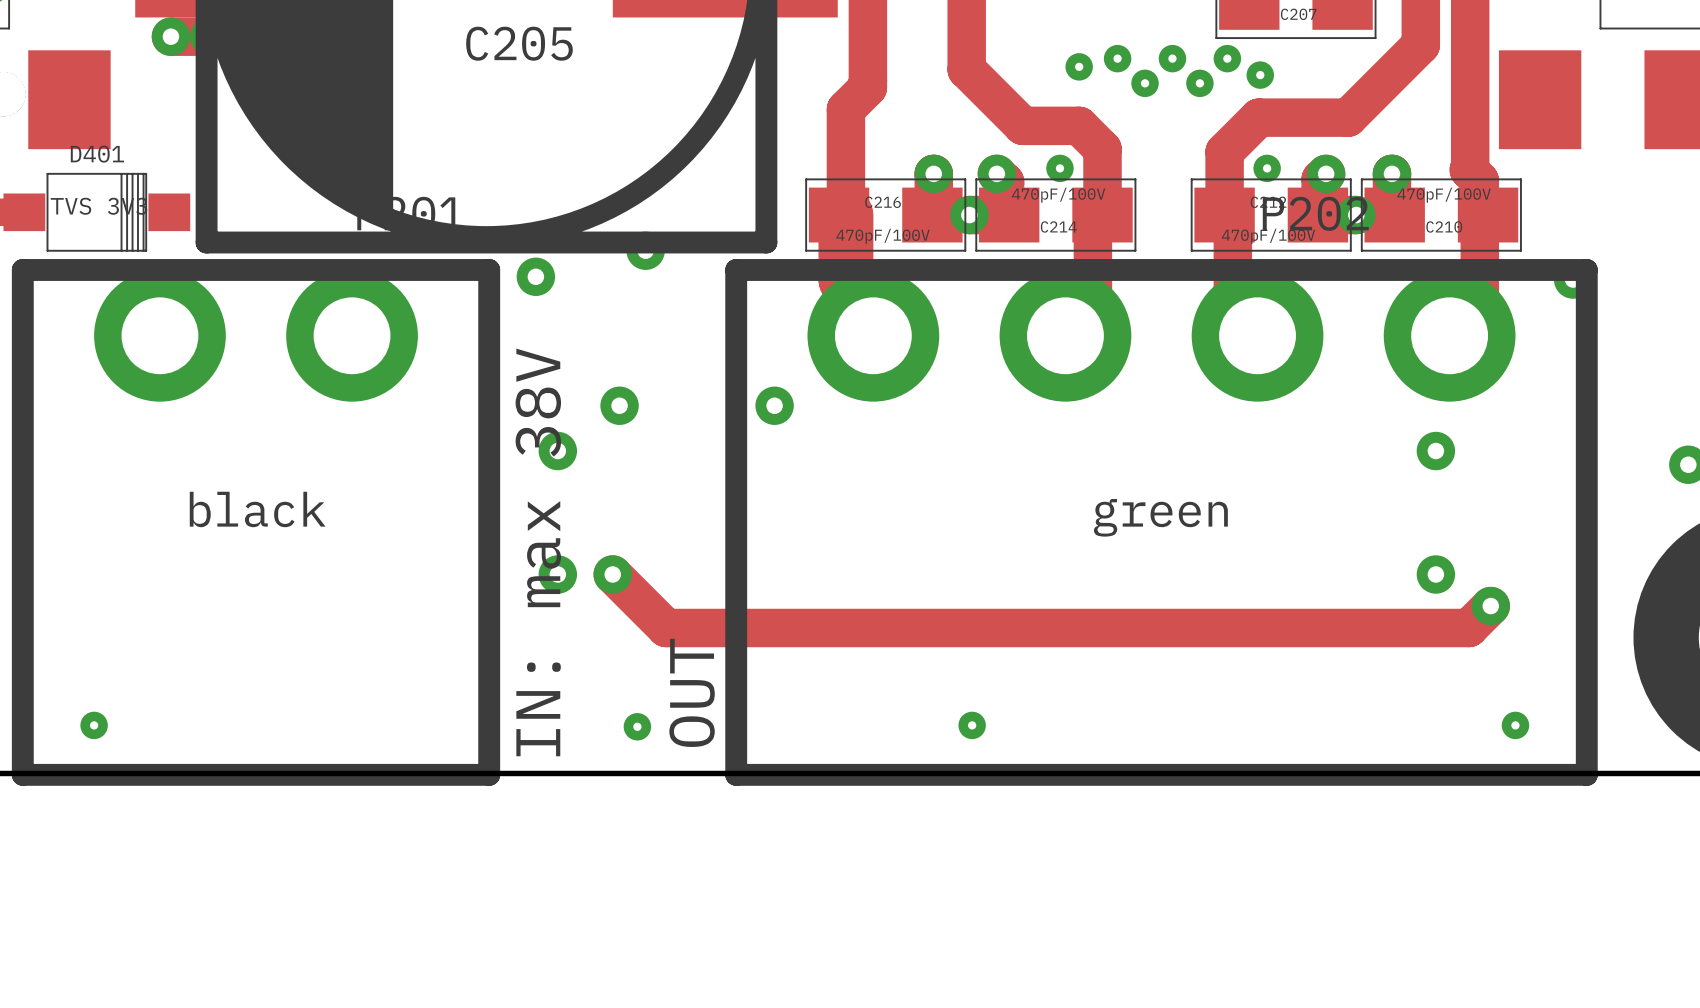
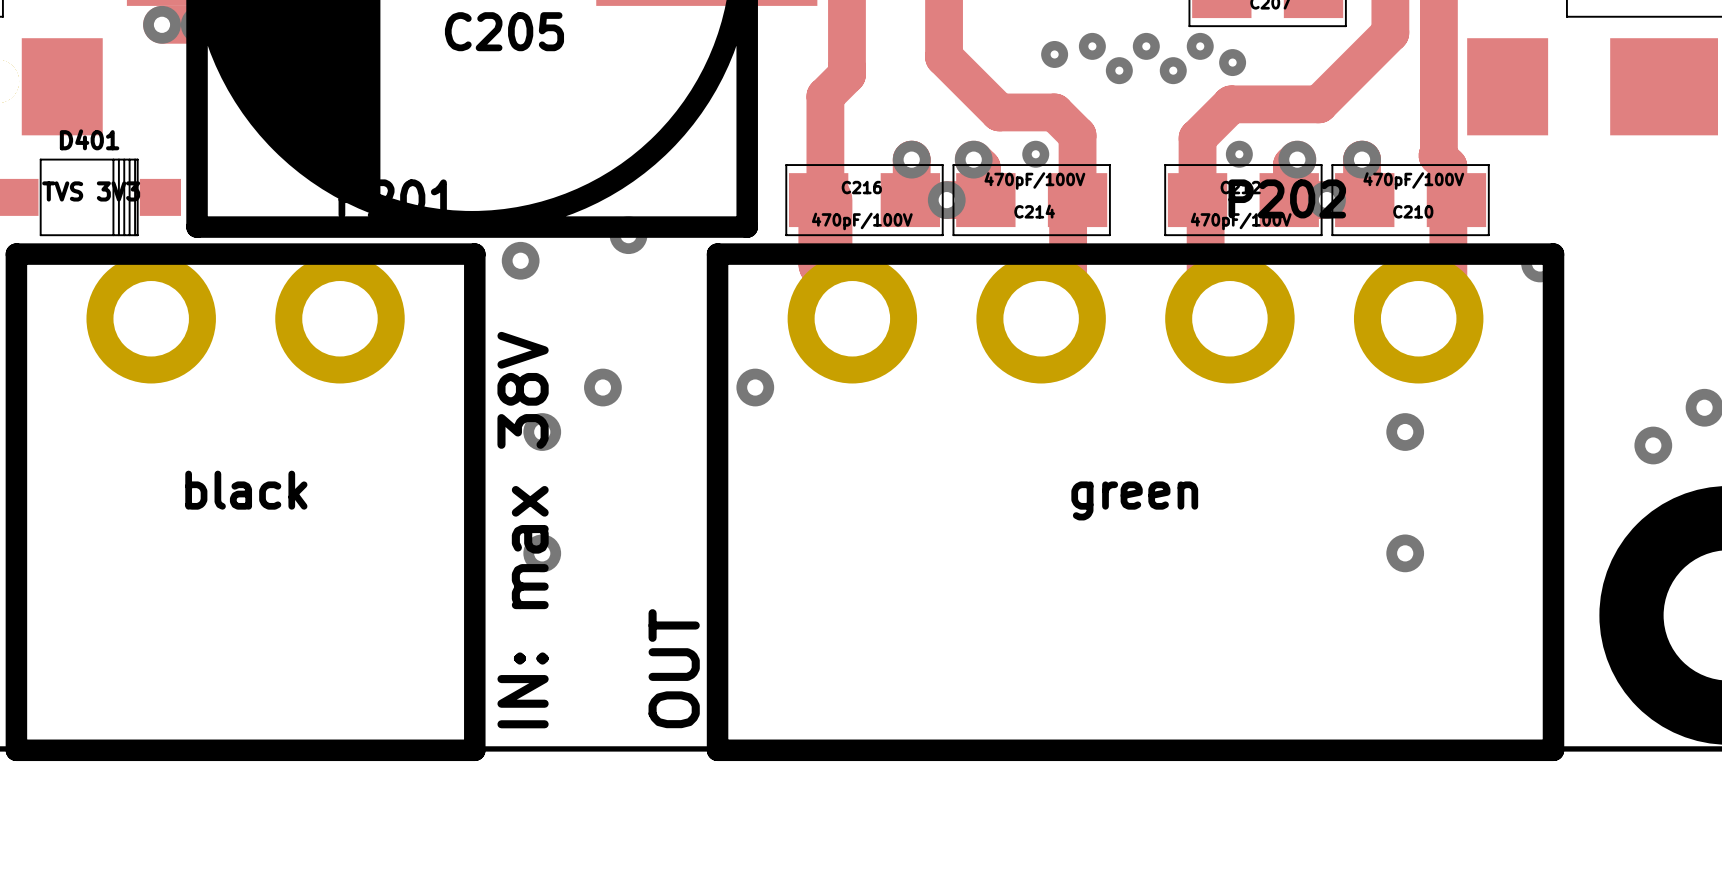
track: (612, 574) (666, 628) (1468, 628) (1490, 606) -> none
via: (612, 574) -> none
via: (1490, 606) -> none
via: (94, 725) -> none
via: (972, 725) -> none
via: (1515, 725) -> none
via: (637, 726) -> none

